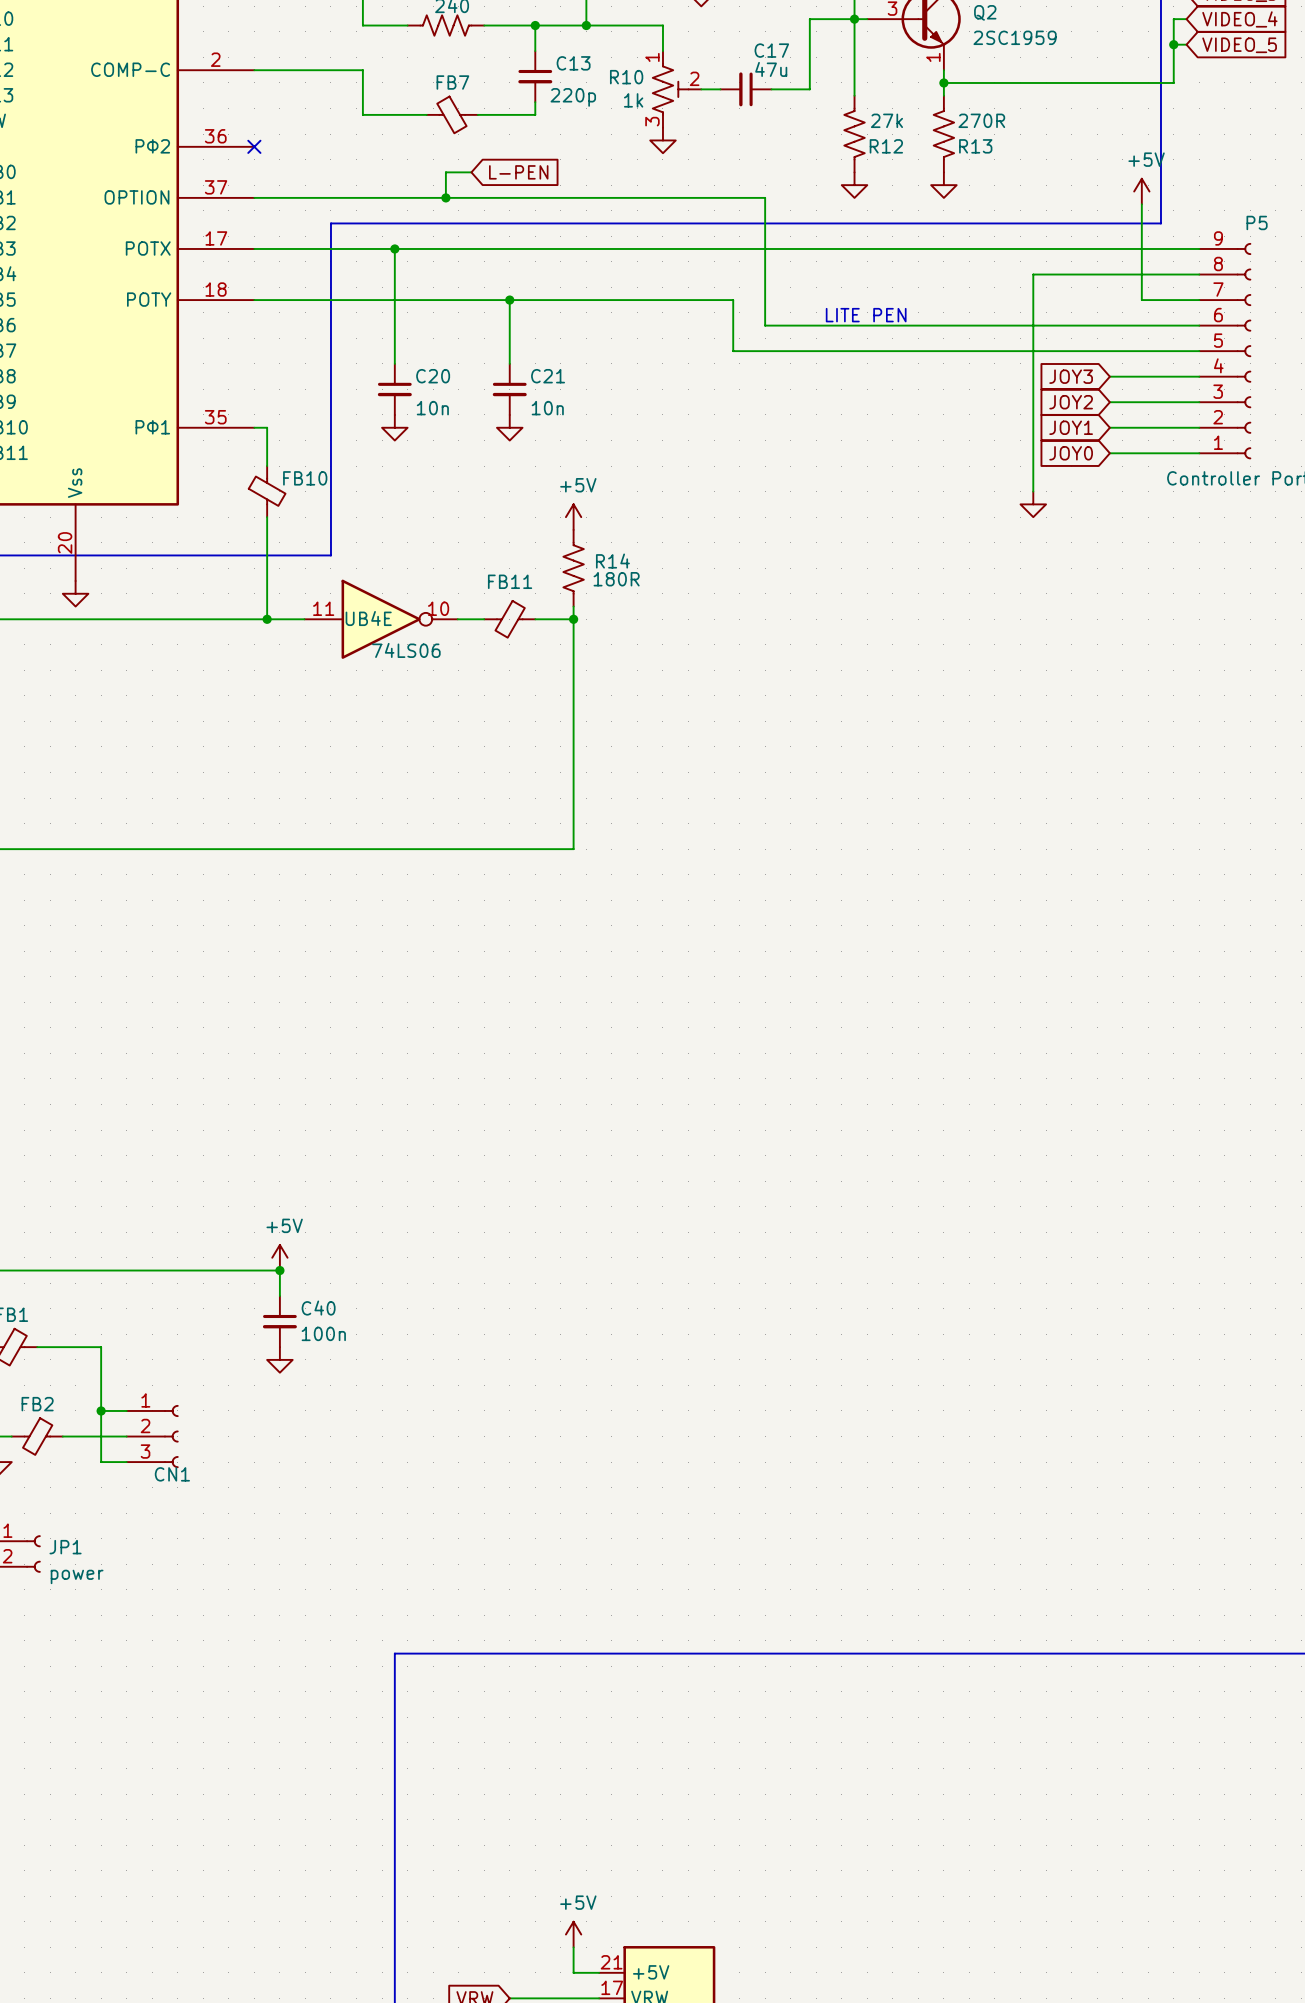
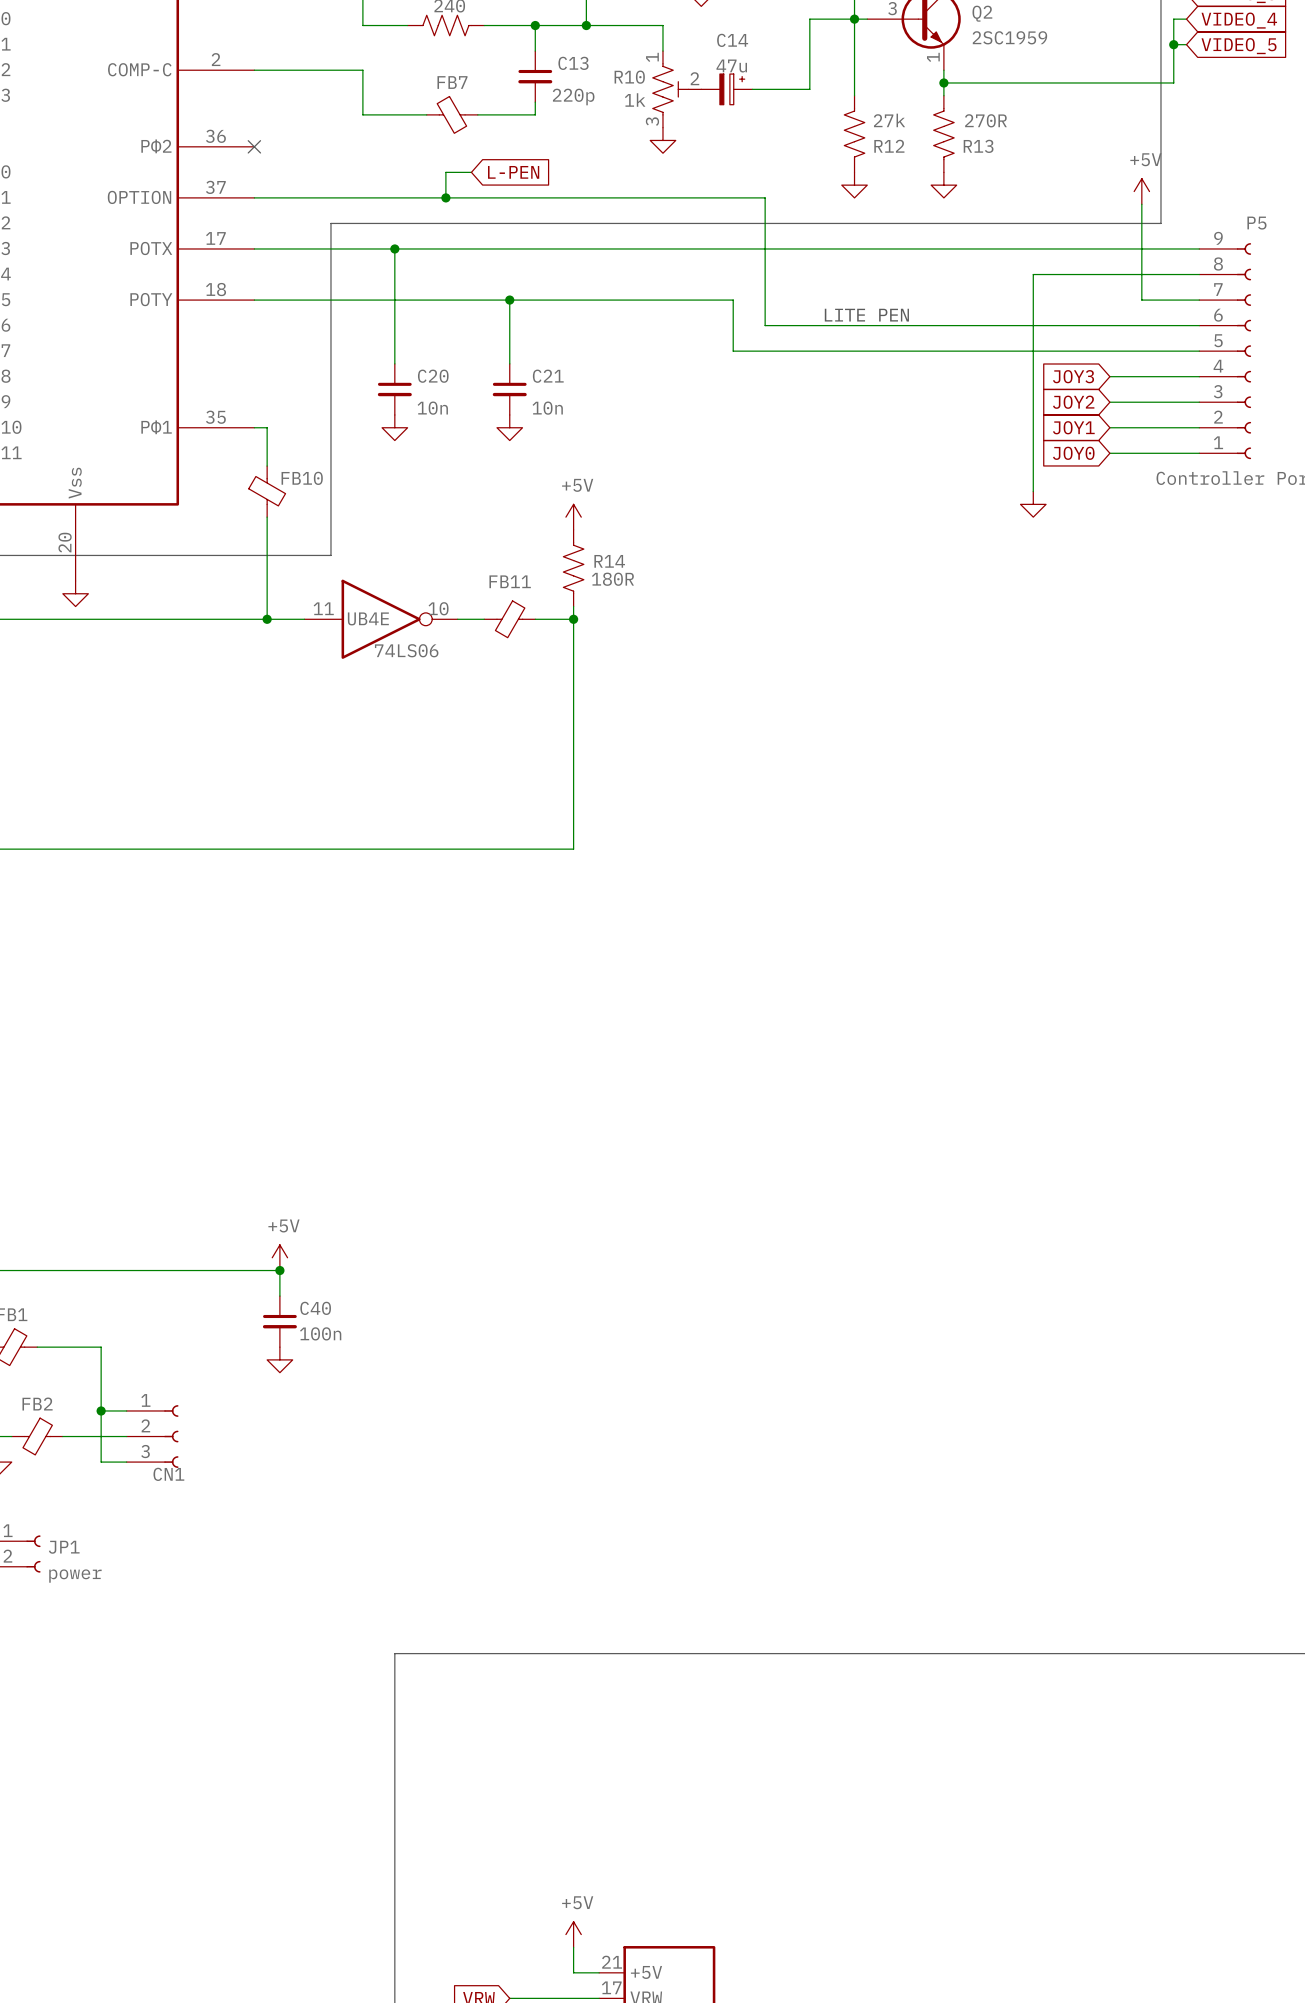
C14: none -> 47u (726, 89)
C17: 47u (745, 89) -> none

